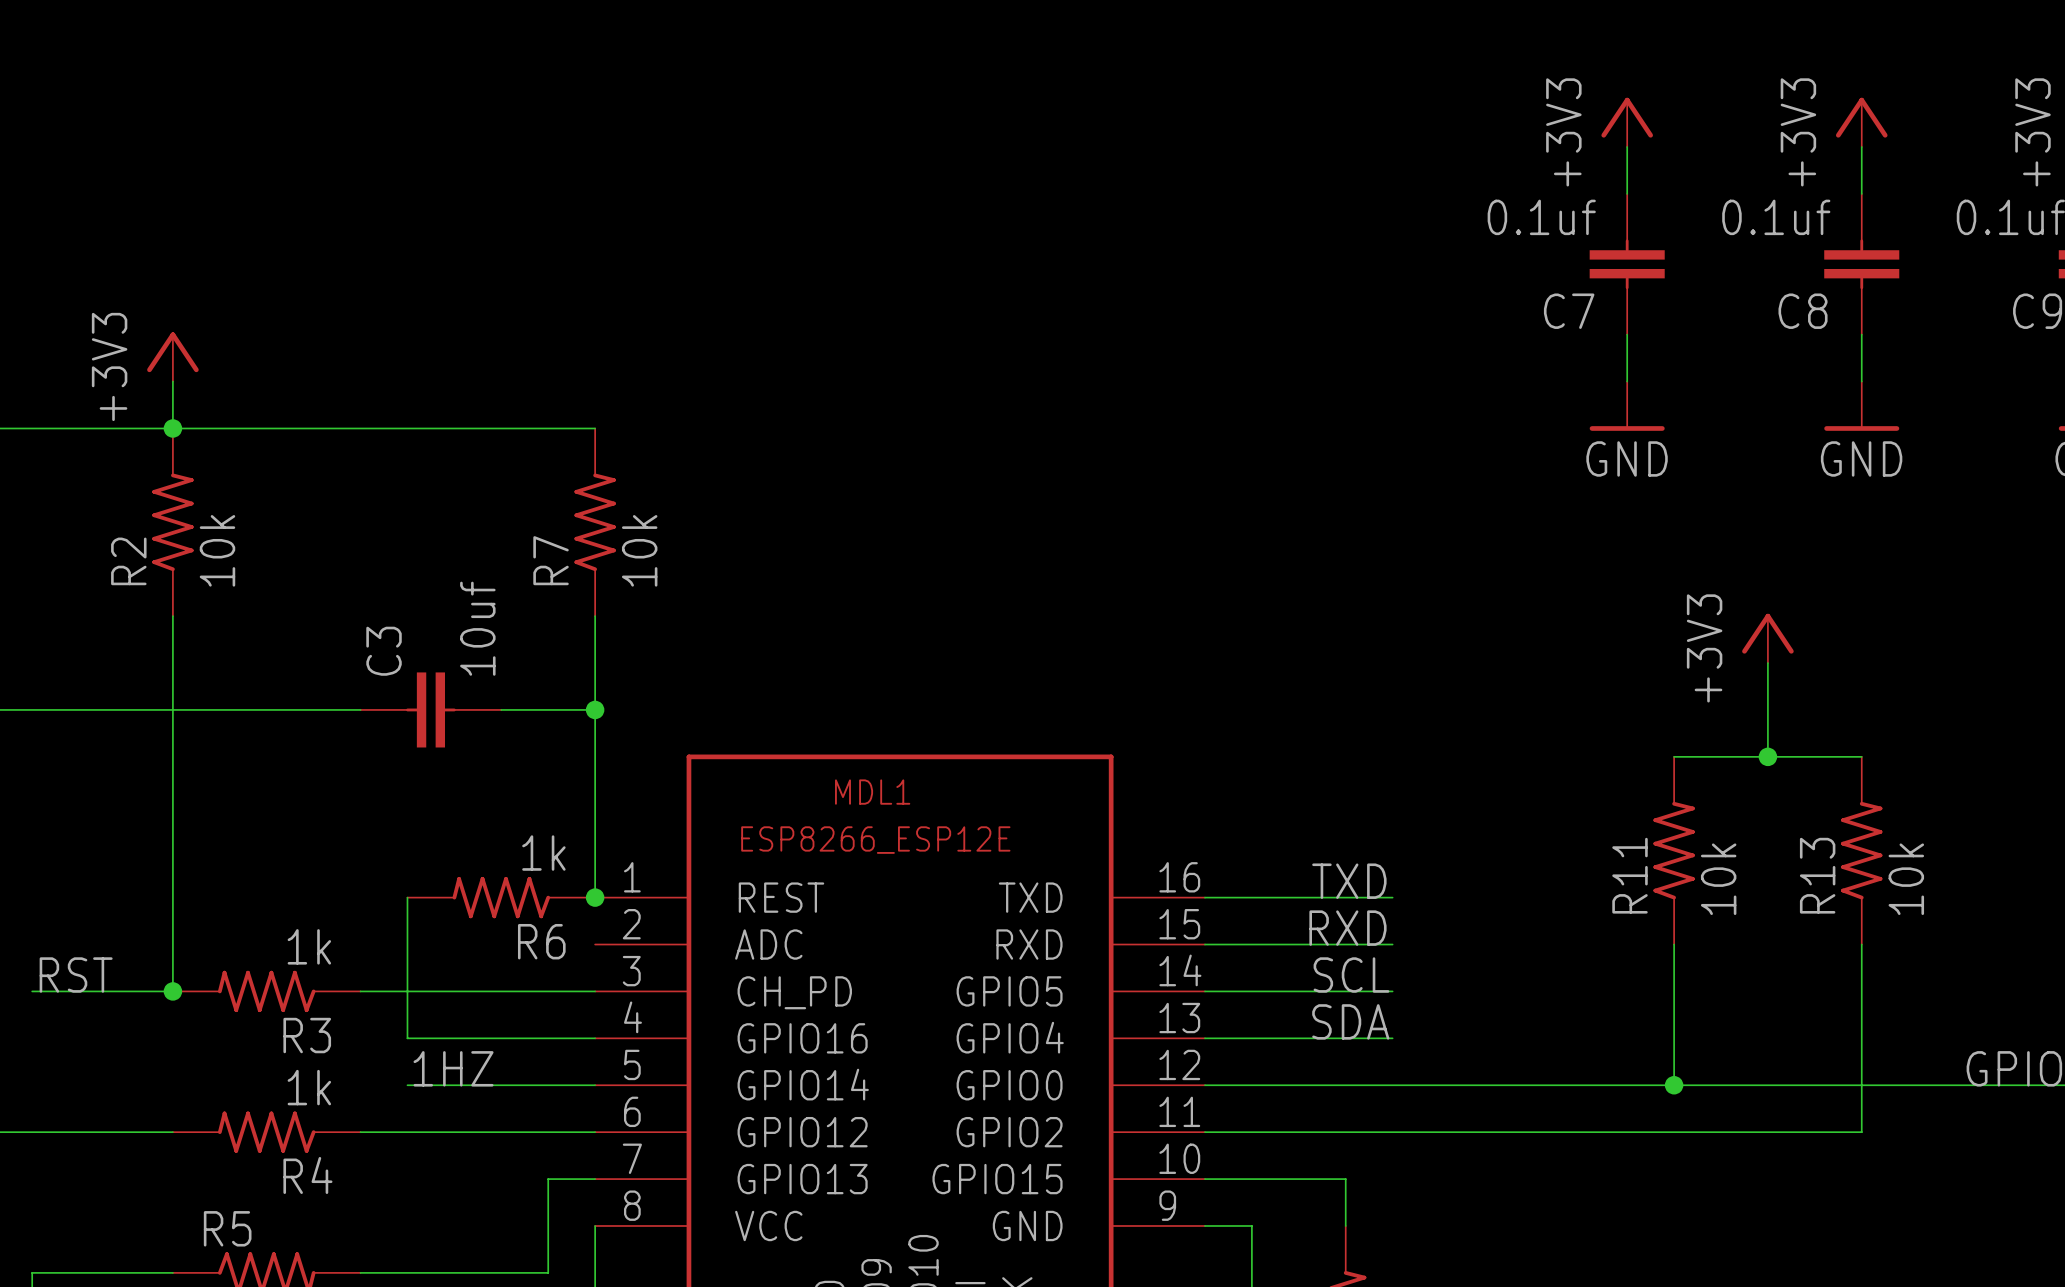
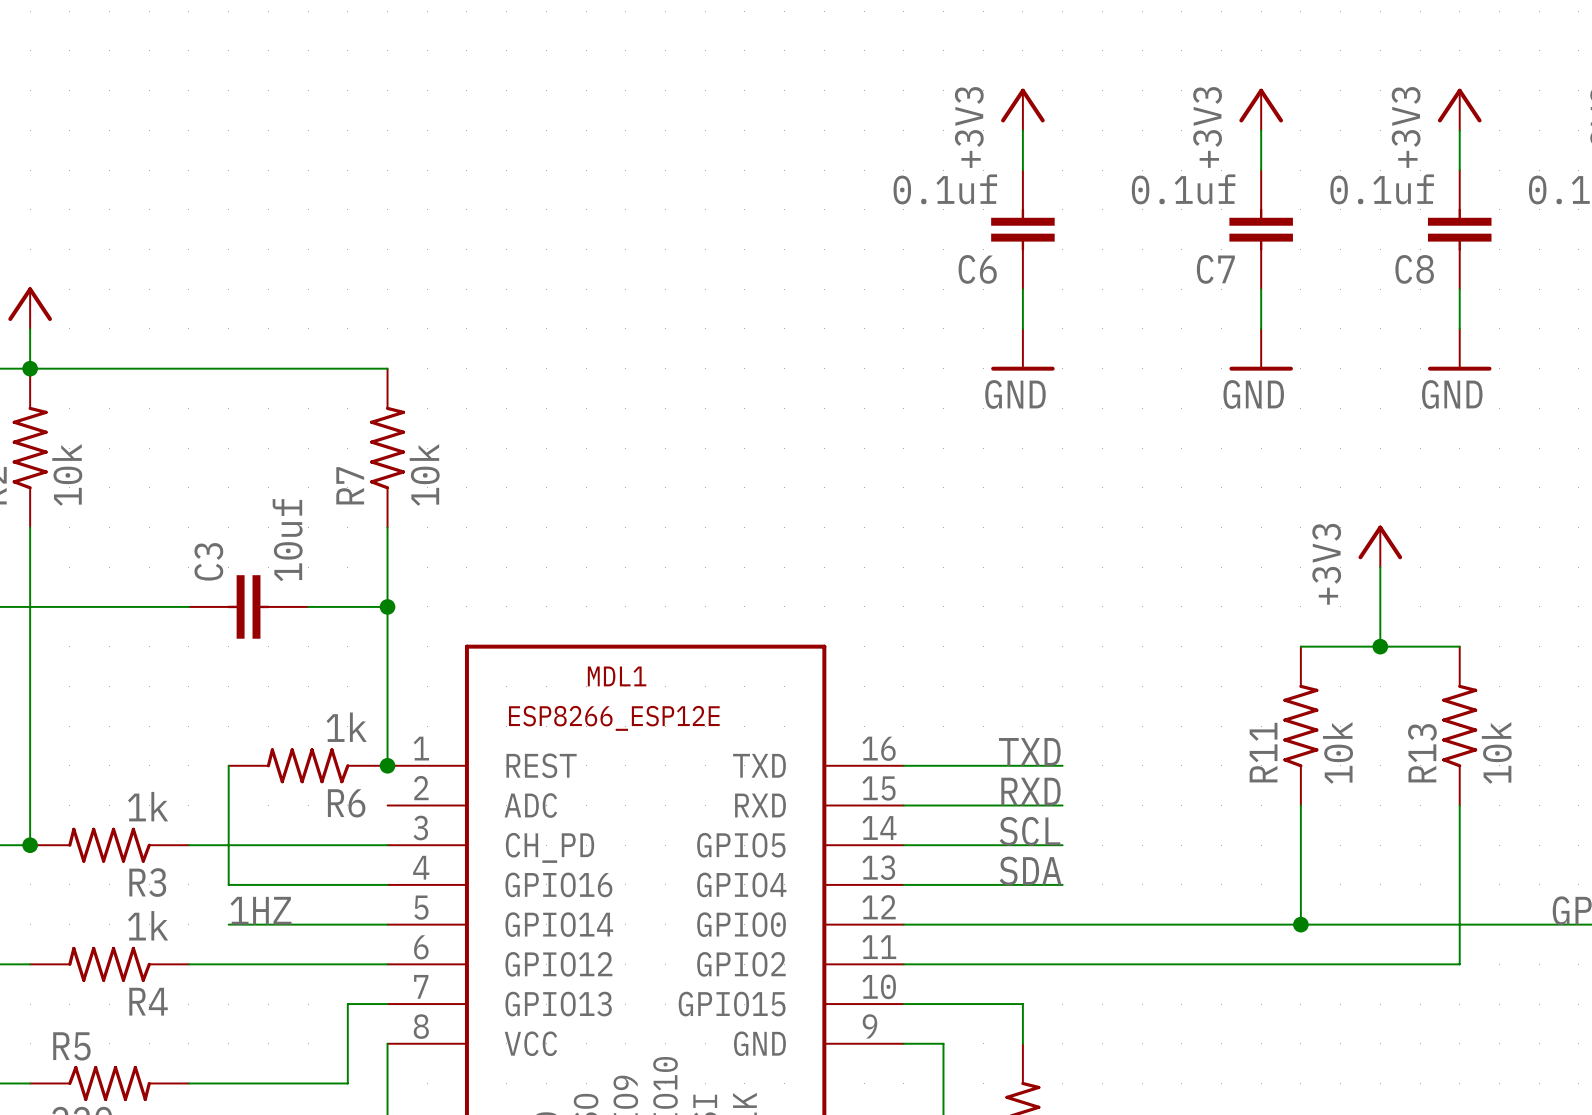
power symbol: none -> +3V3 (1022, 109)
wire: none -> (1022, 130) (1022, 170)
C6: none -> 0.1uf (1022, 229)
wire: none -> (1022, 289) (1022, 328)
power symbol: none -> GND (1022, 349)

